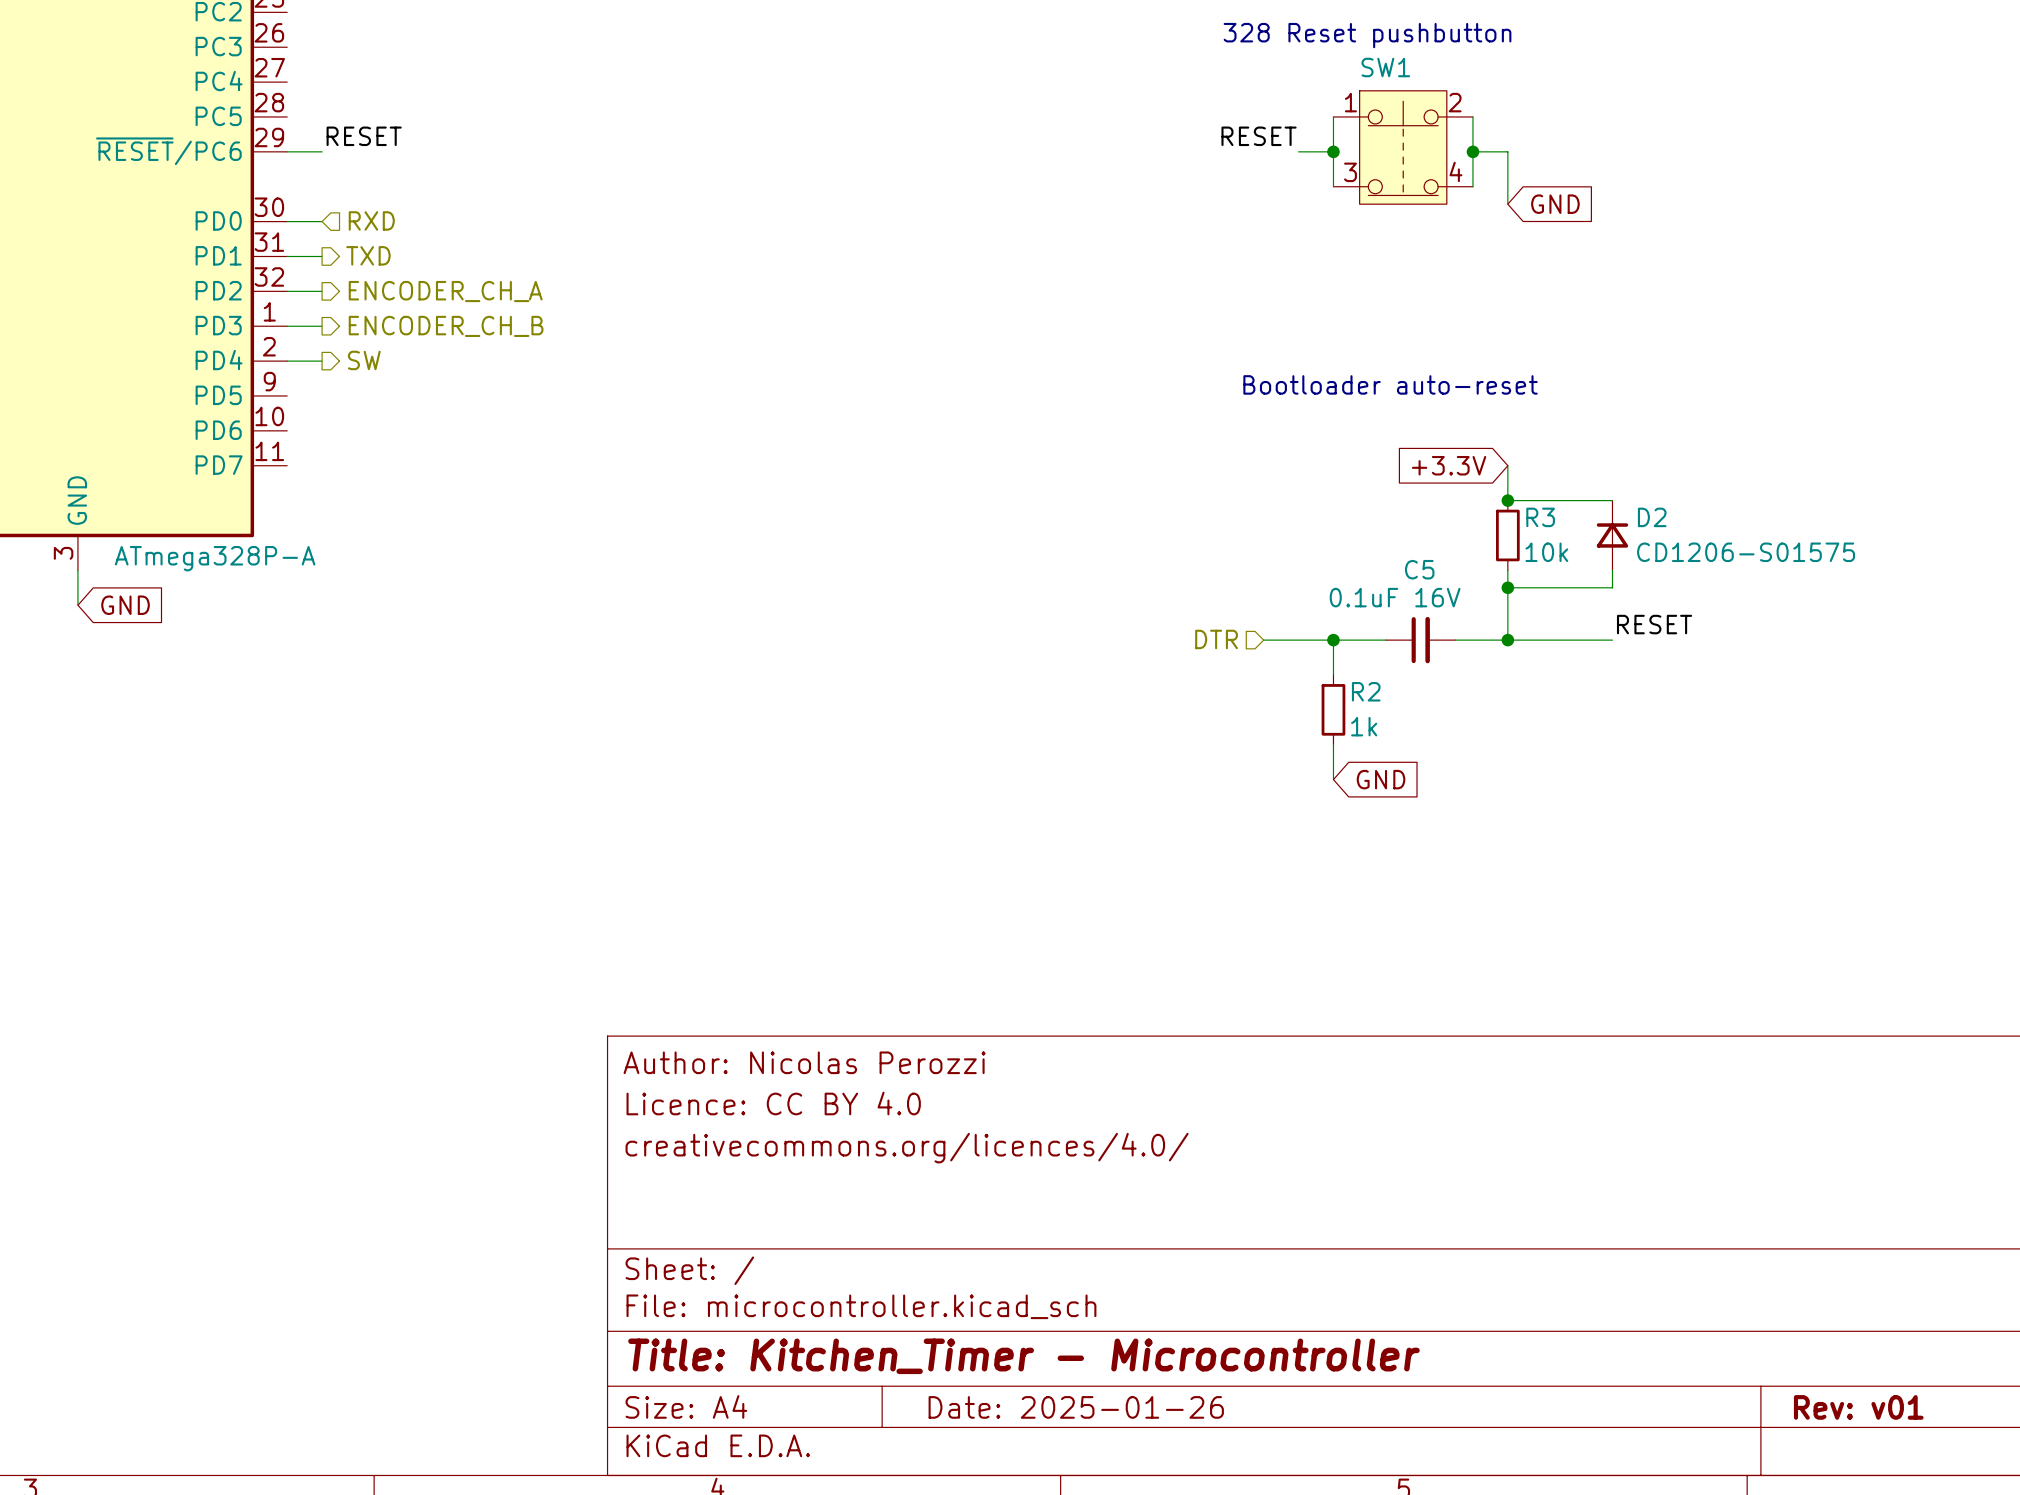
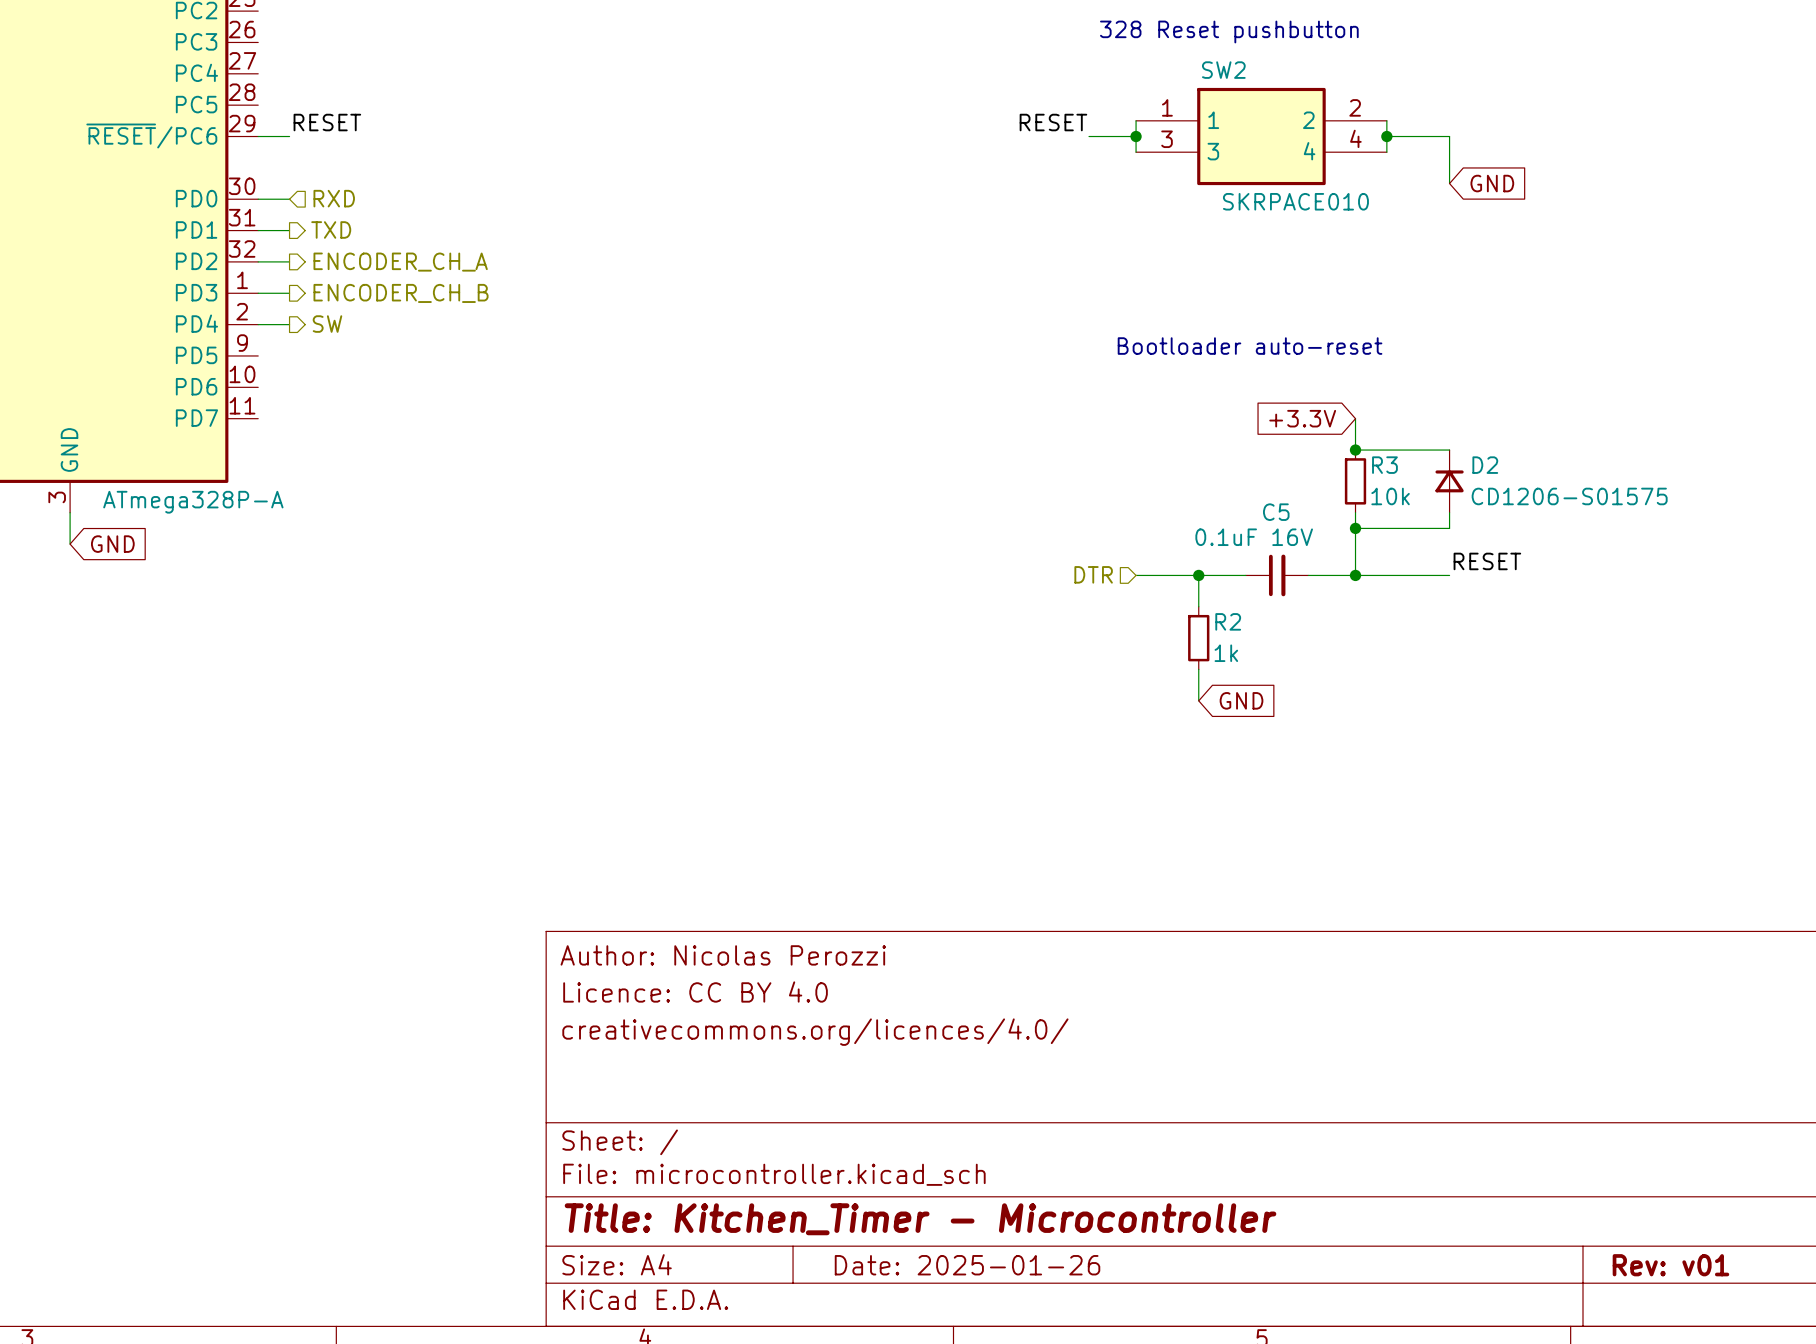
wire: none -> (1136, 120) (1136, 152)
wire: none -> (1386, 120) (1386, 152)
label position: RESET (1259, 136) -> RESET (1053, 122)
SW1: (1403, 147) -> none
wire: none -> (1089, 136) (1136, 136)
wire: (1298, 151) (1333, 151) -> none
junction position: (1333, 151) -> (1136, 136)
SW2: none -> SKRPACE010 (1261, 136)
wire: (1472, 151) (1507, 151) (1507, 204) -> none
junction position: (1472, 151) -> (1386, 136)
wire: none -> (1386, 136) (1449, 136) (1449, 183)
global label position: GND (1555, 204) -> GND (1492, 183)

